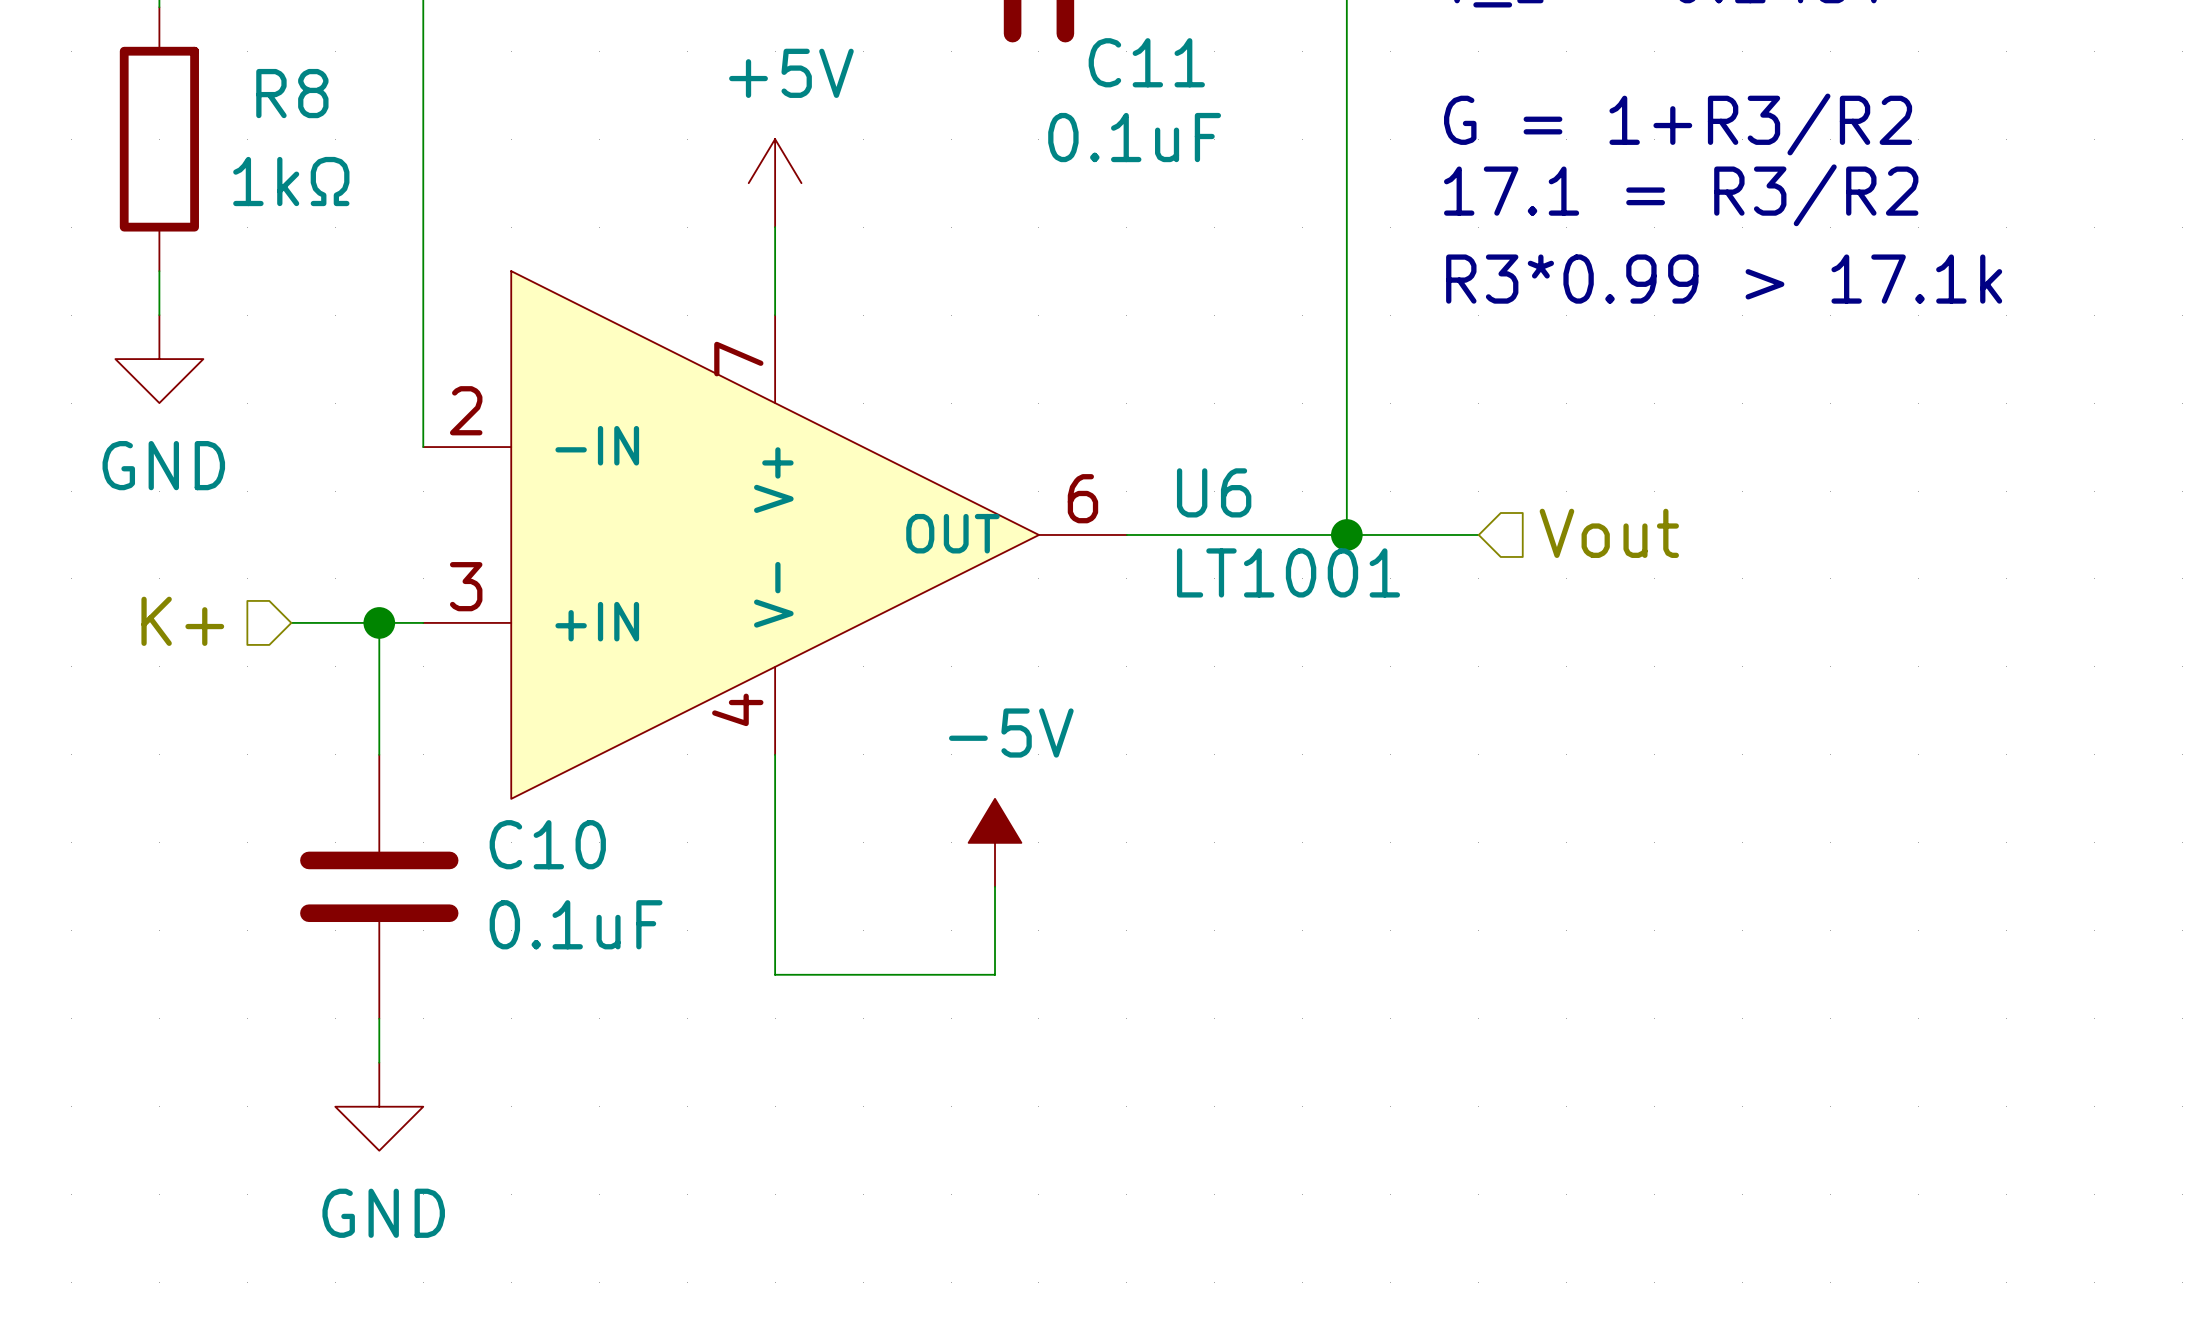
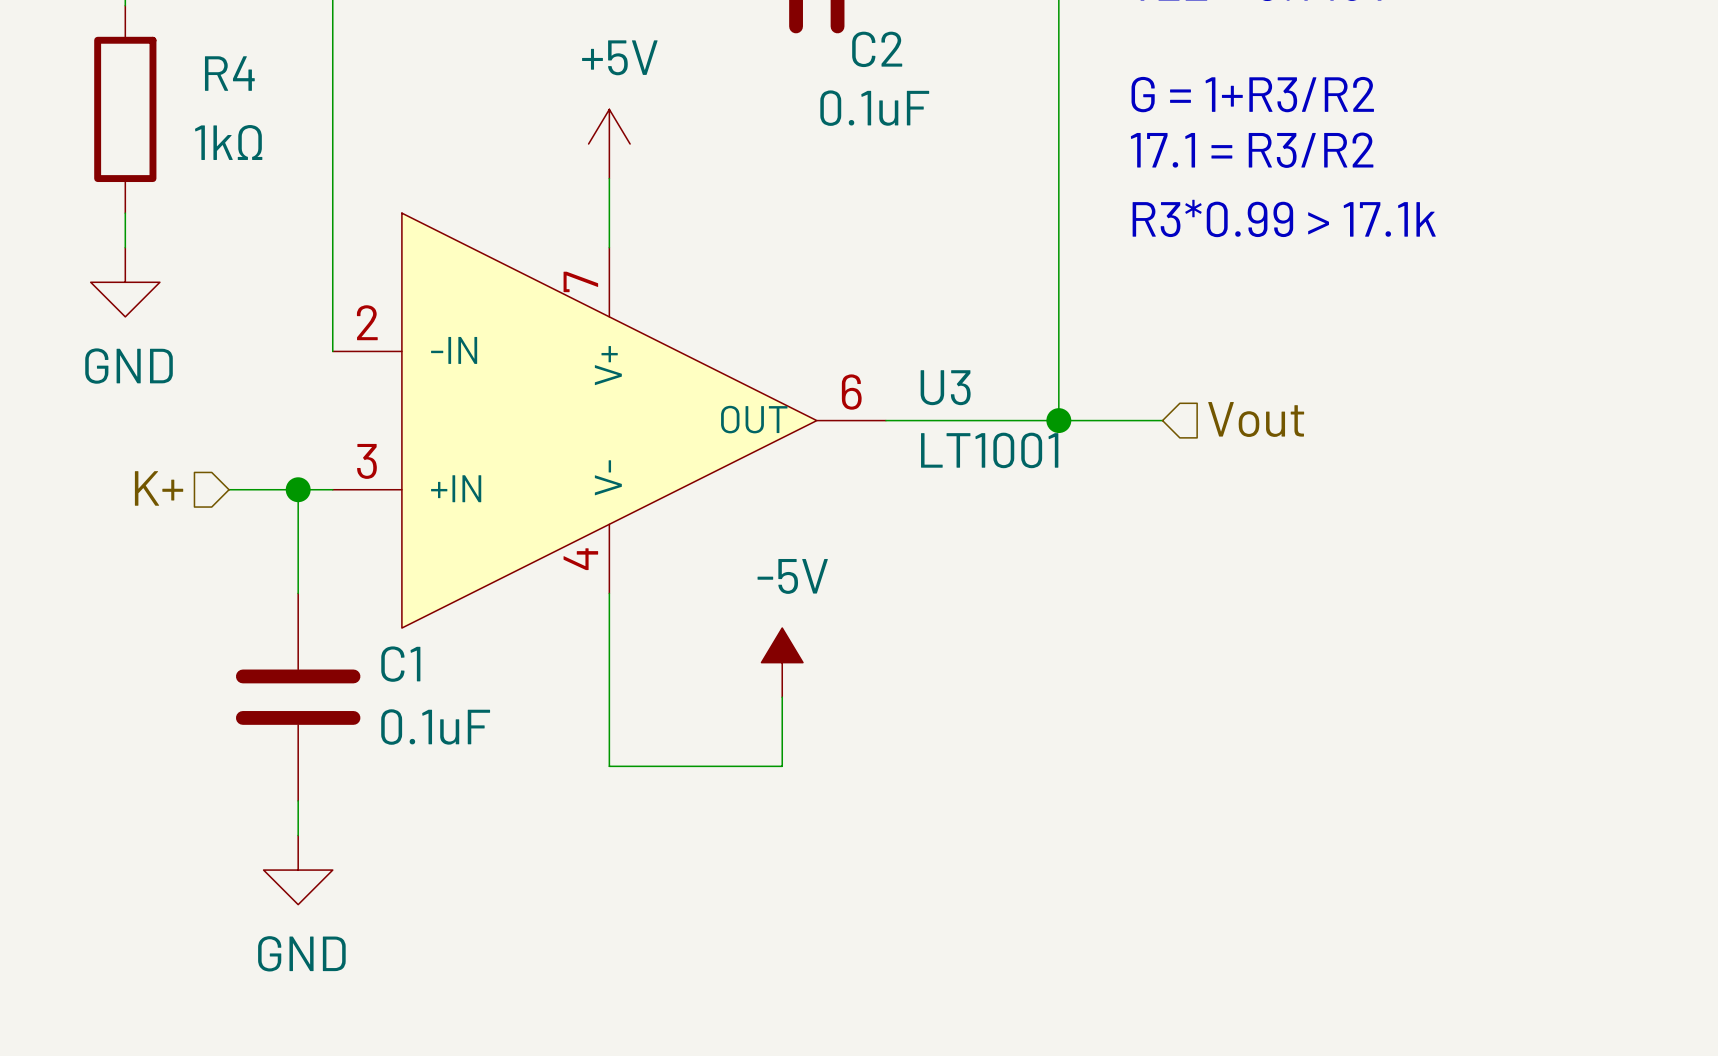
C11 name: C11 (1146, 62) -> C2 (877, 49)
R8 name: R8 (292, 93) -> R4 (229, 73)
U6 name: U6 (1214, 492) -> U3 (945, 387)
C10 name: C10 (547, 844) -> C1 (400, 664)

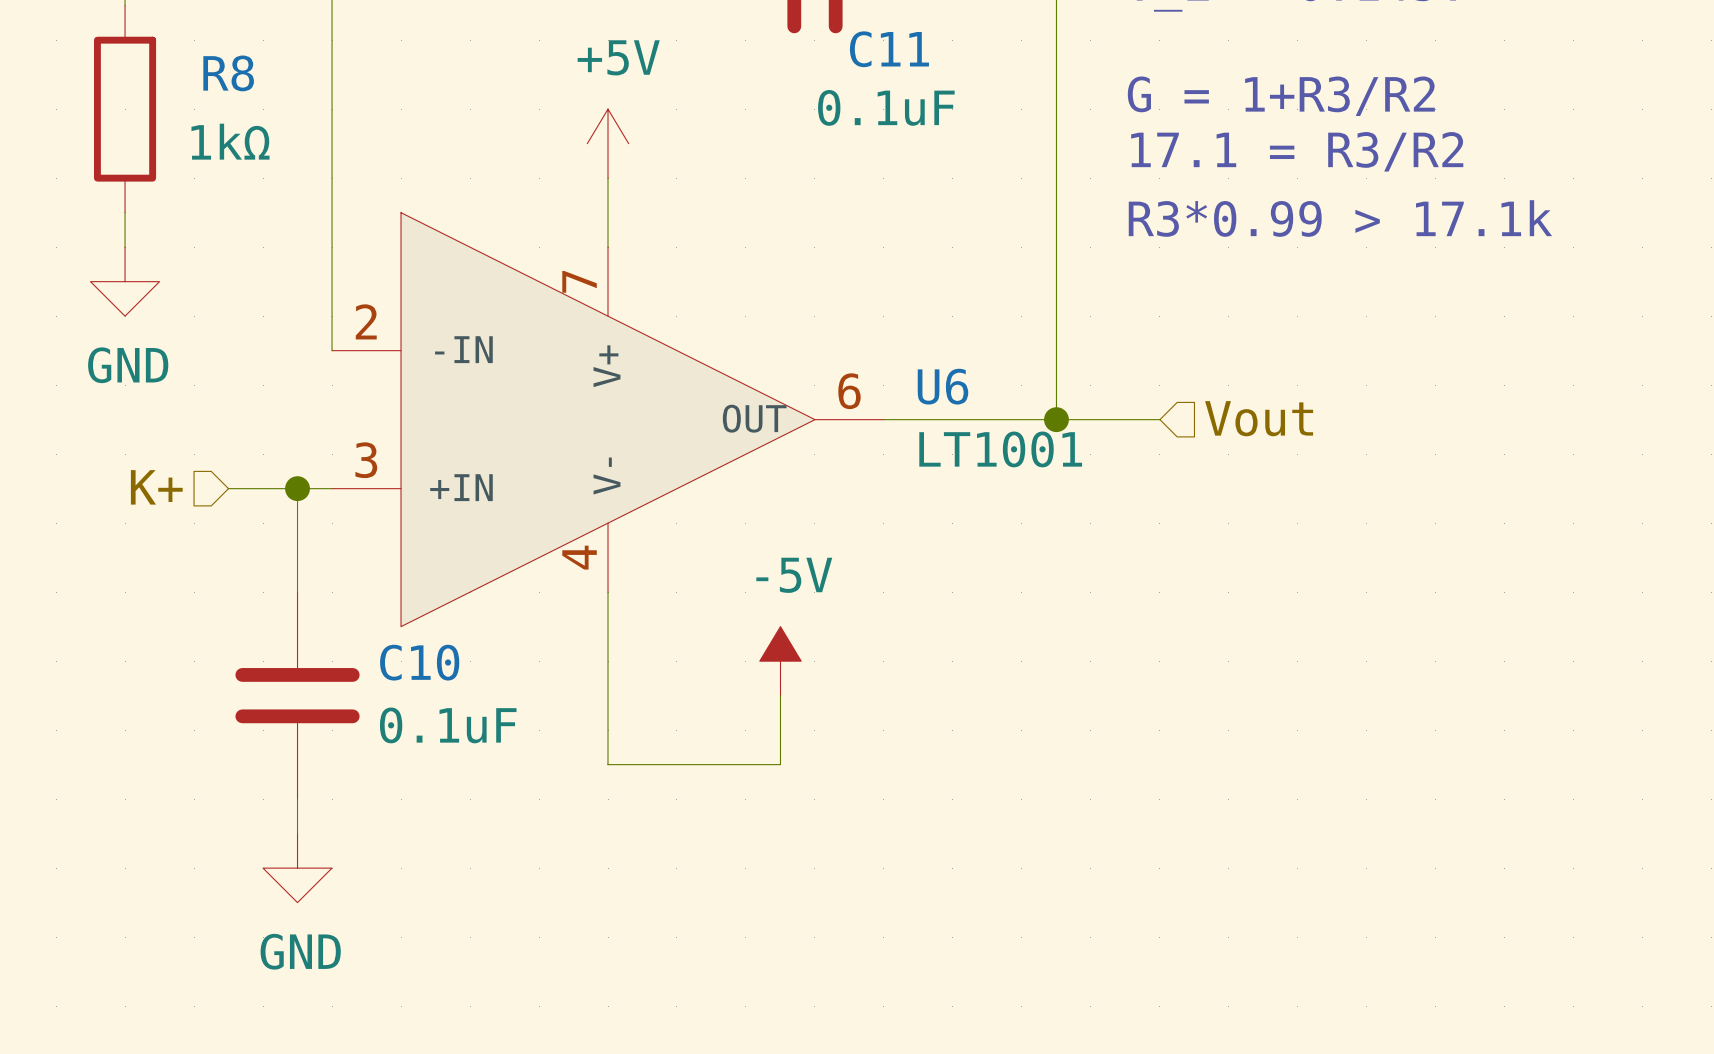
C2 name: C2 (877, 49) -> C11 (889, 49)
R4 name: R4 (229, 73) -> R8 (228, 73)
U3 name: U3 (945, 387) -> U6 (942, 386)
C1 name: C1 (400, 664) -> C10 (419, 662)

